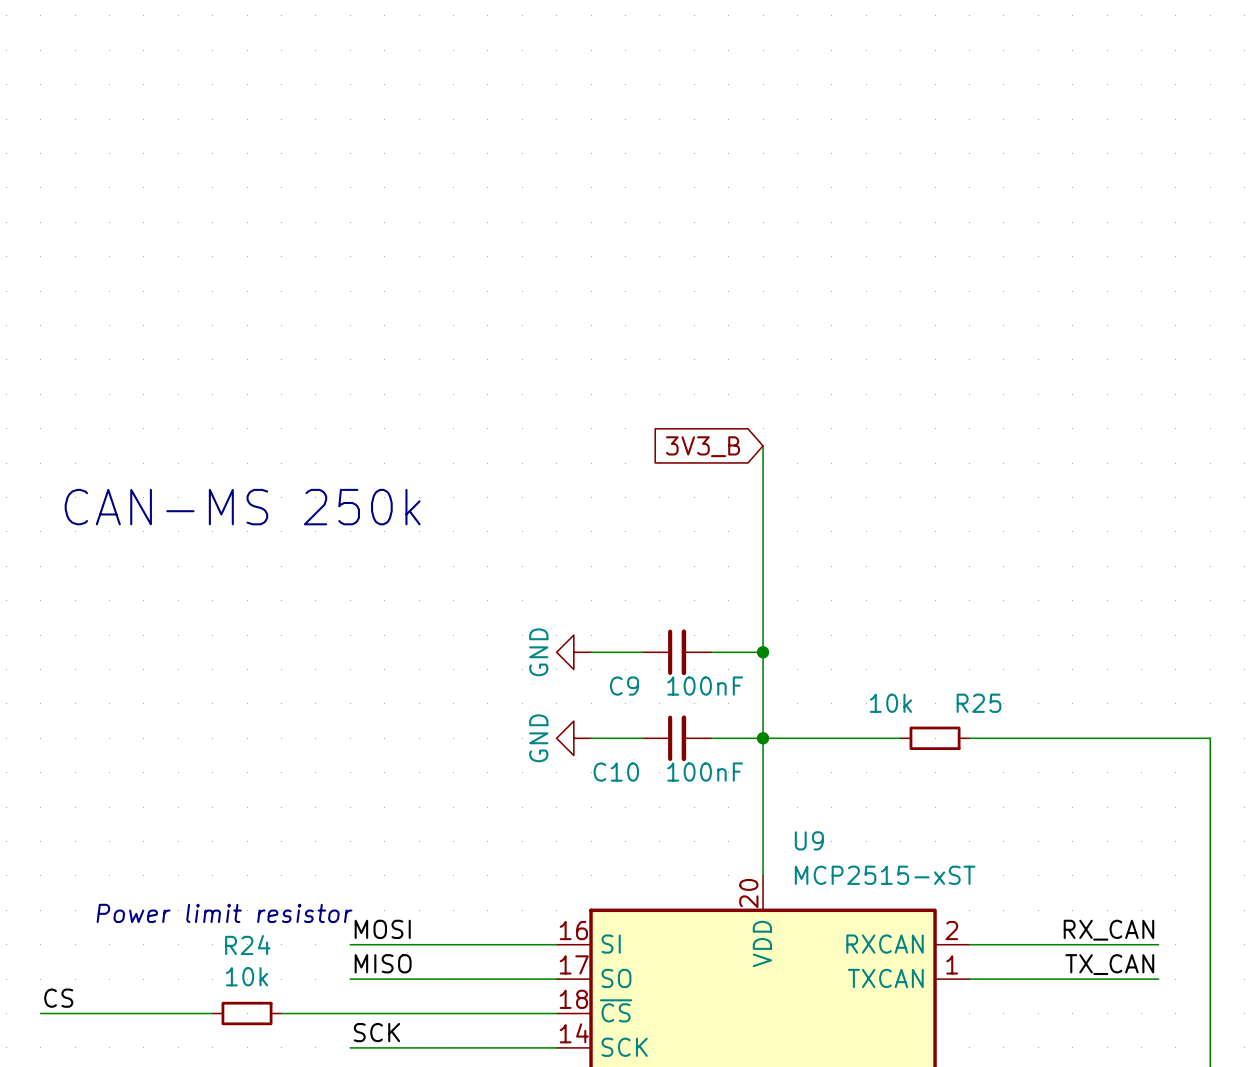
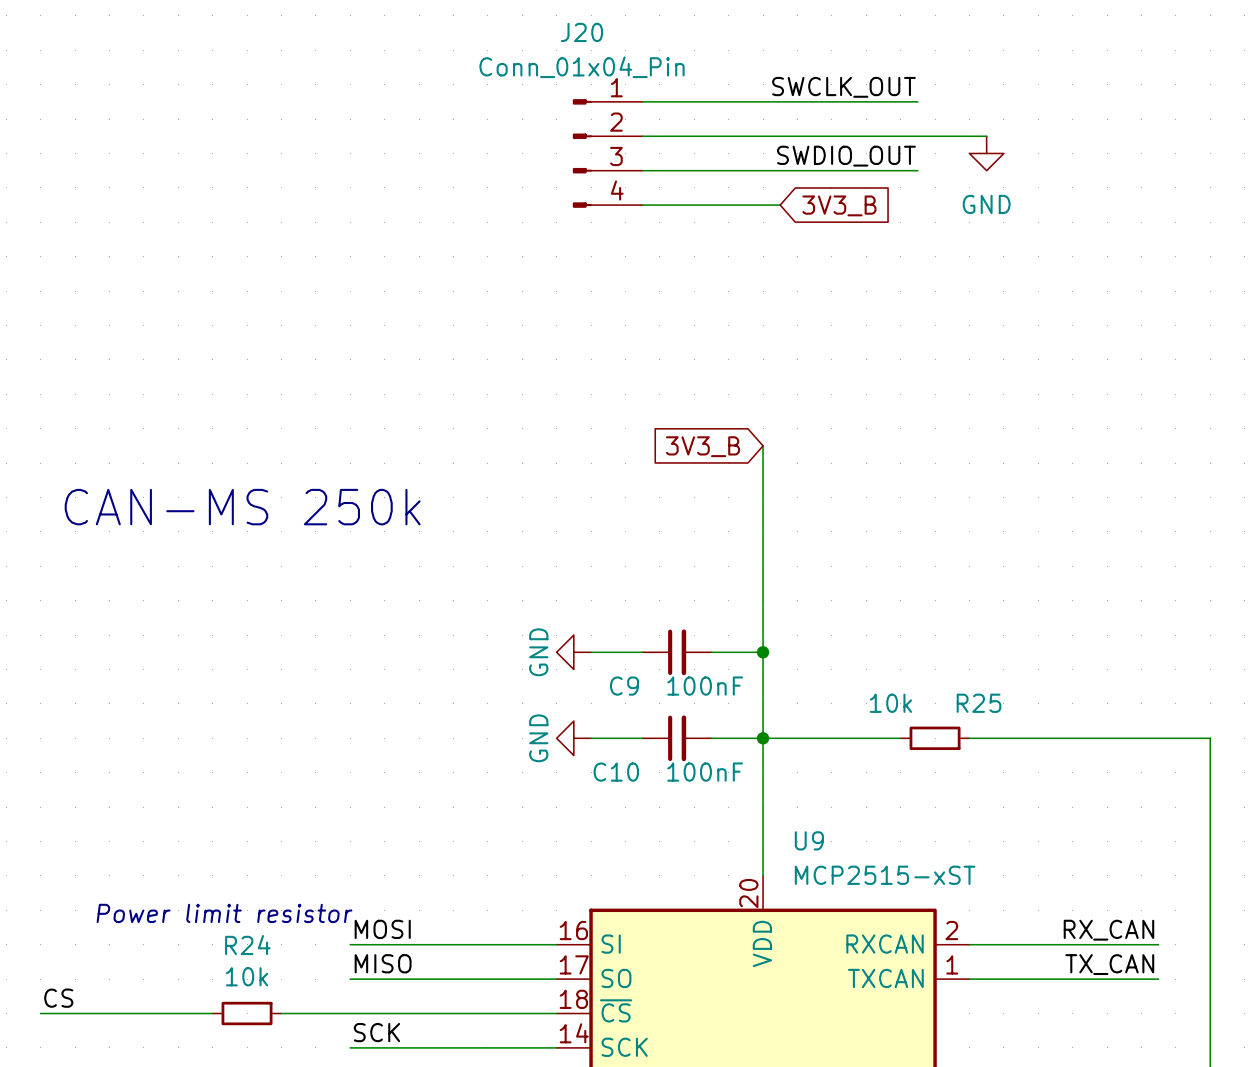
label: none -> SWCLK_OUT (844, 87)
wire: none -> (642, 101) (917, 101)
wire: none -> (642, 136) (986, 136)
J20: none -> Conn_01x04_Pin (607, 153)
power symbol: none -> GND (986, 153)
label: none -> SWDIO_OUT (846, 156)
wire: none -> (642, 170) (917, 170)
wire: none -> (642, 205) (780, 205)
global label: none -> 3V3_B (839, 205)

